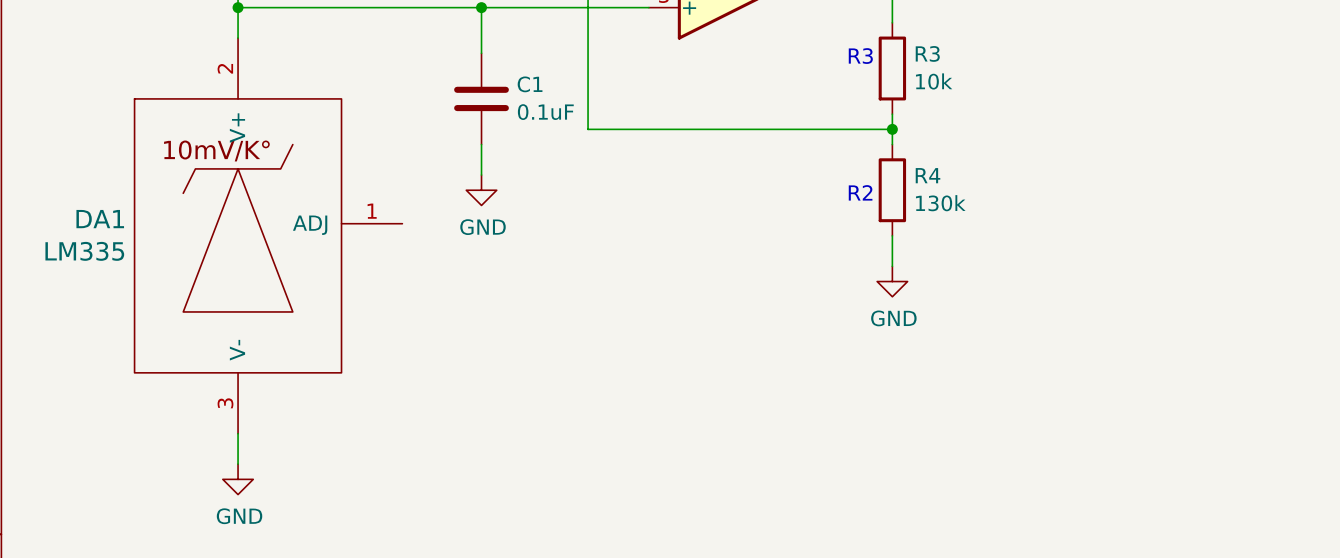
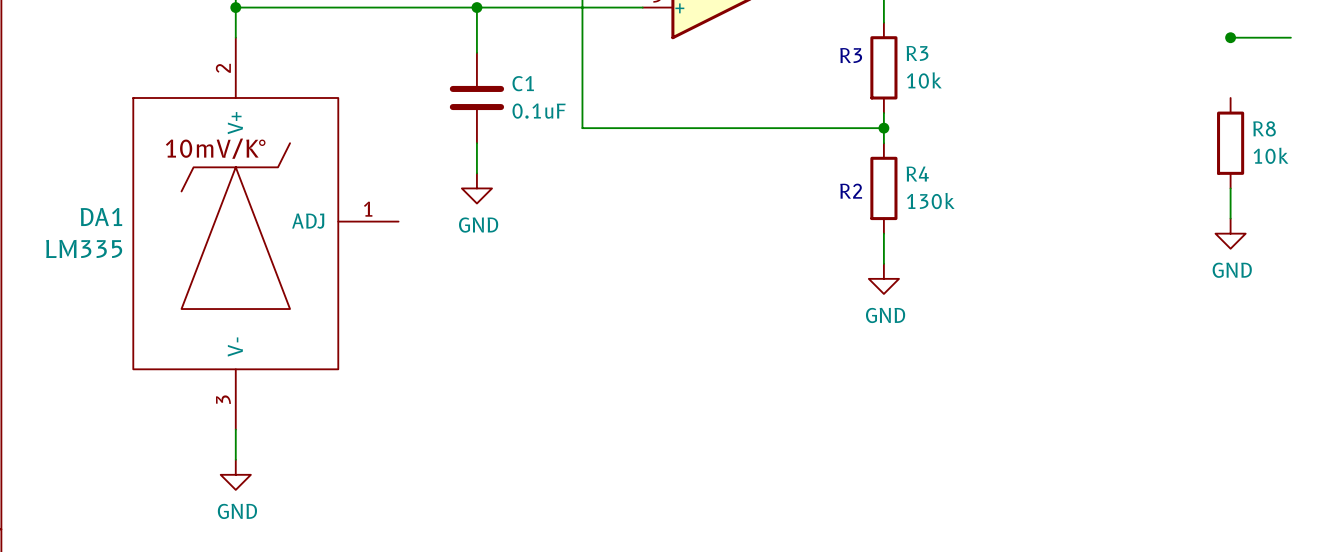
wire: none -> (1230, 37) (1290, 37)
junction: none -> (1230, 37)
R8: none -> 10k (1230, 143)
wire: none -> (1230, 188) (1230, 218)
power symbol: none -> GND (1230, 233)

